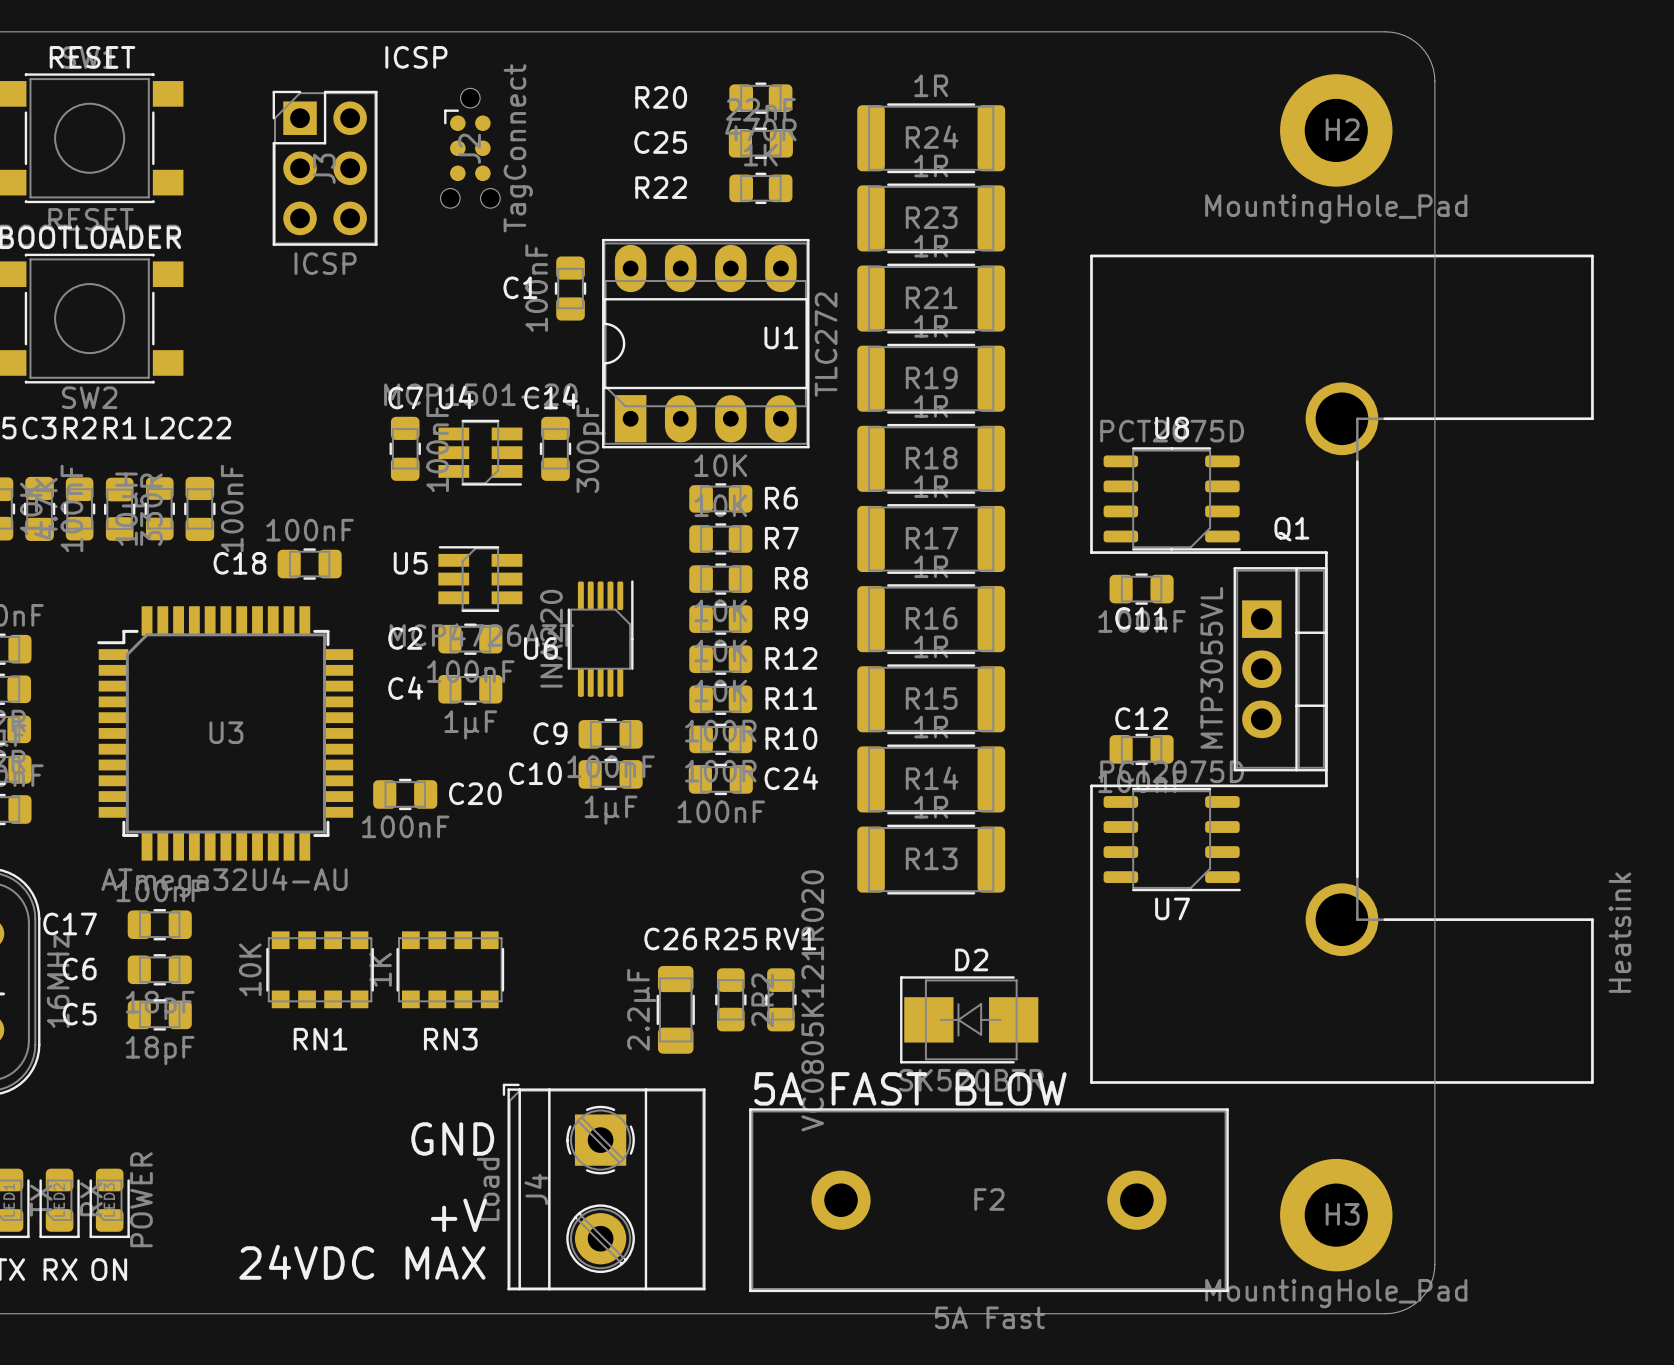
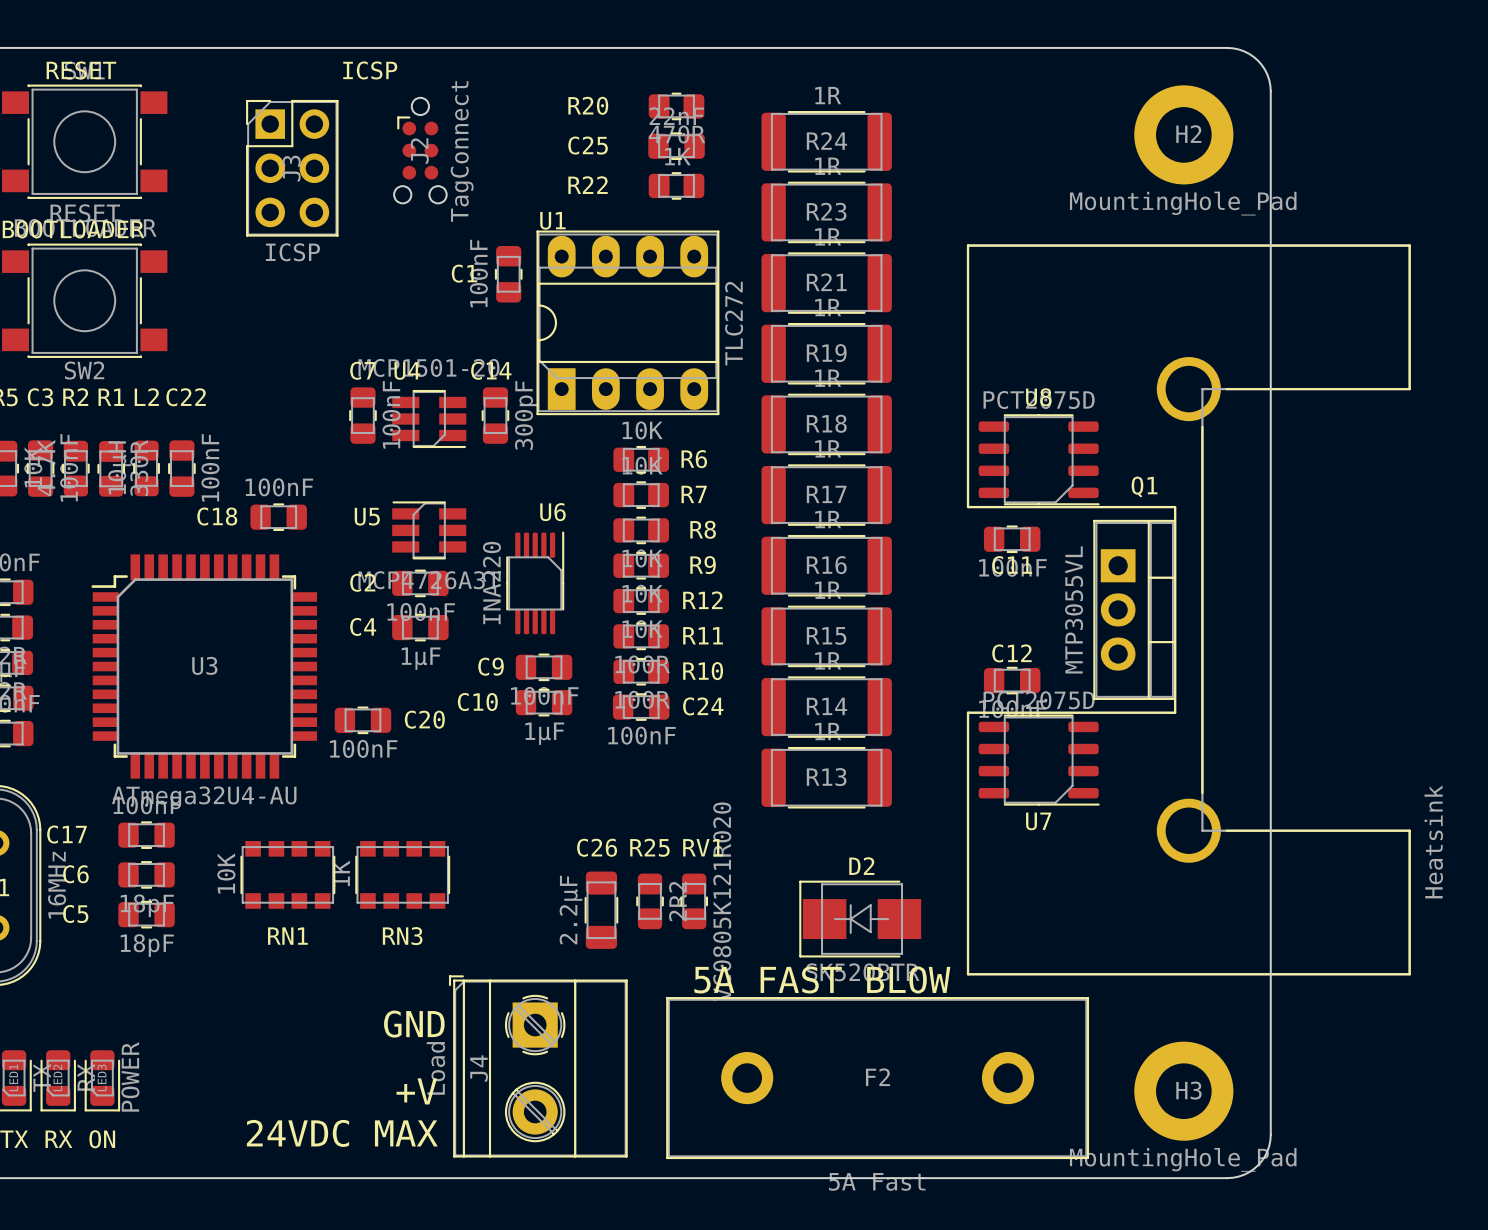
U1 name position: U1 (781, 337) -> U1 (552, 220)
U6 name position: U6 (540, 648) -> U6 (552, 512)

